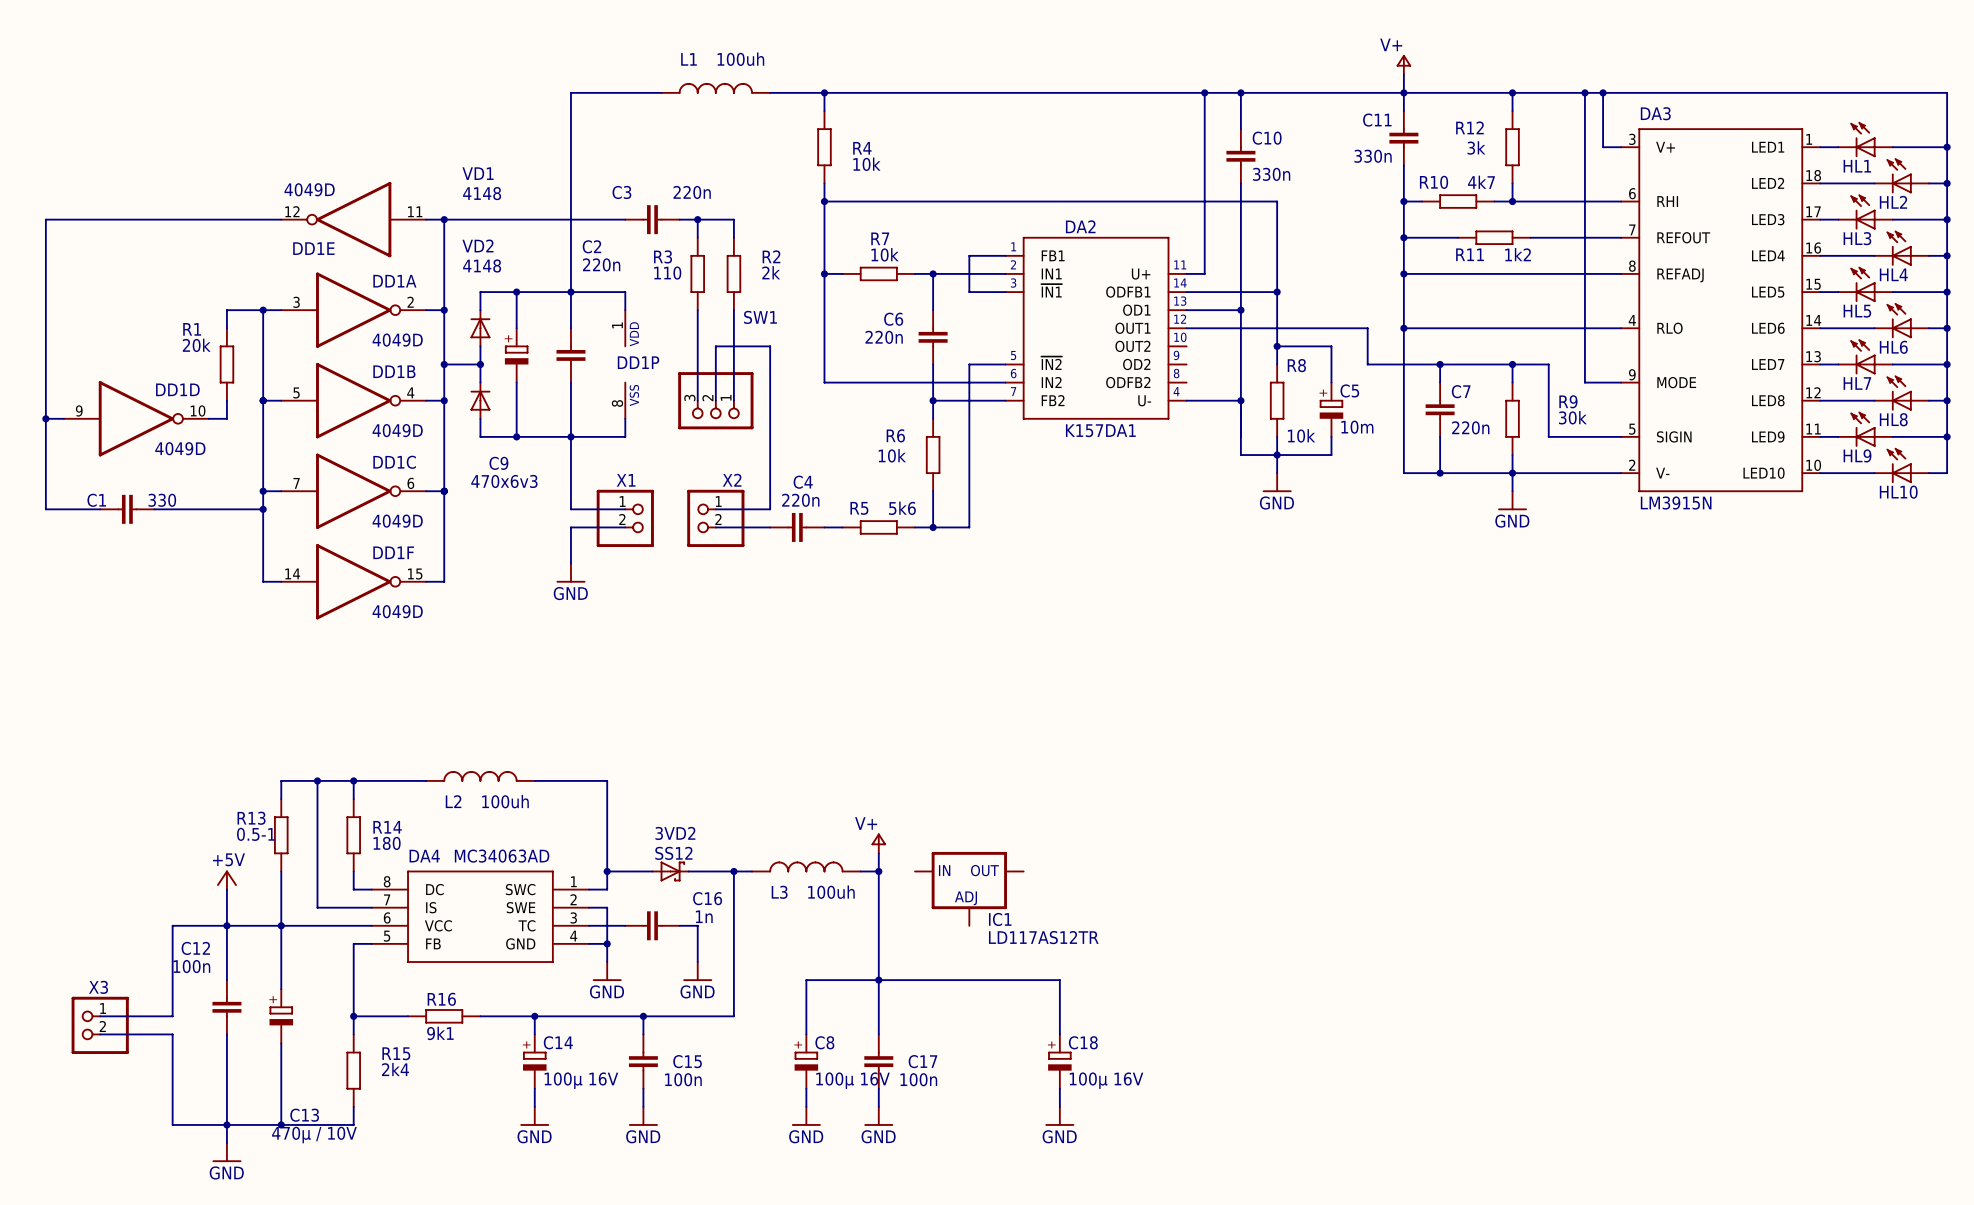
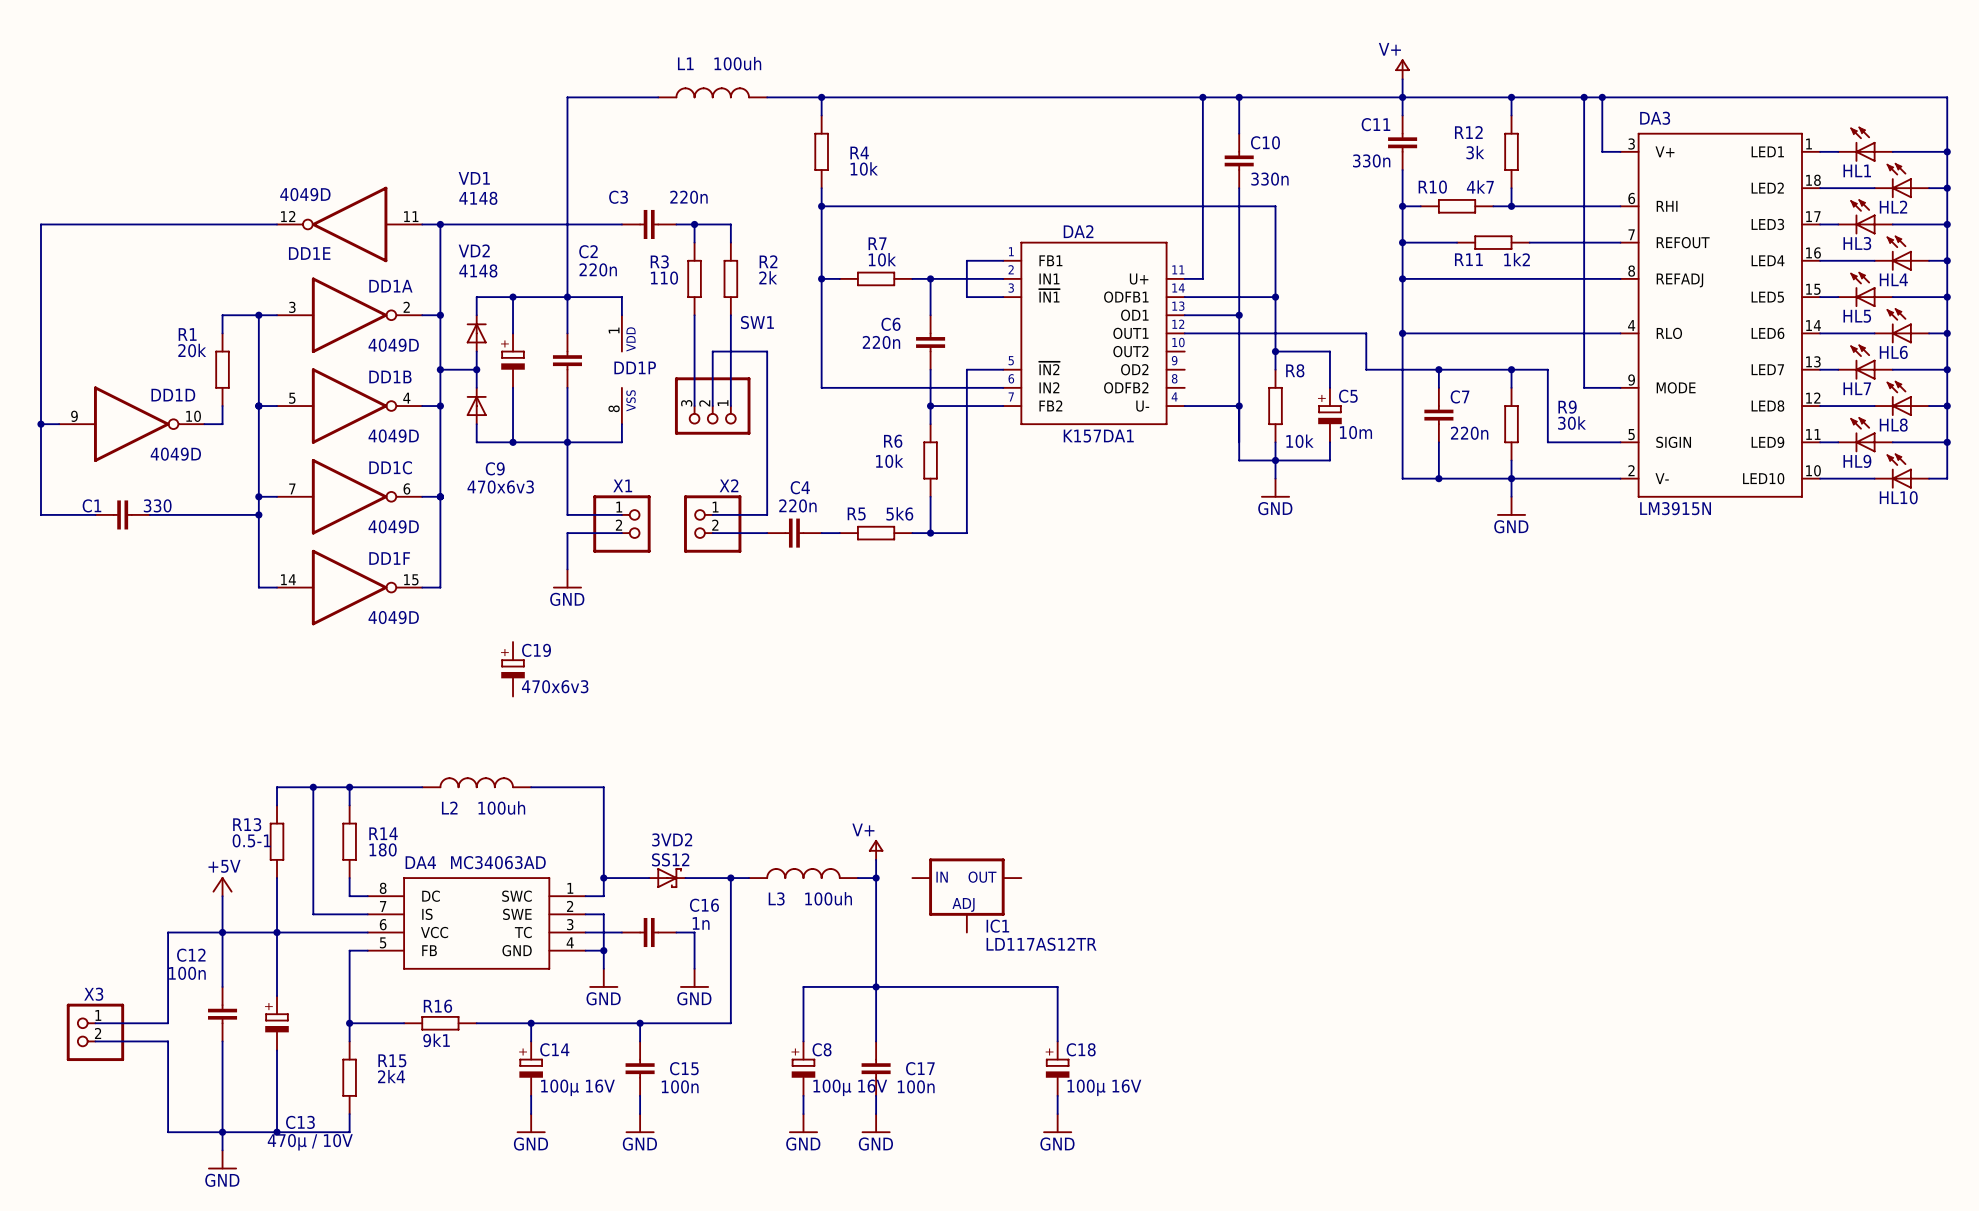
C19: none -> 470x6v3 (513, 669)

